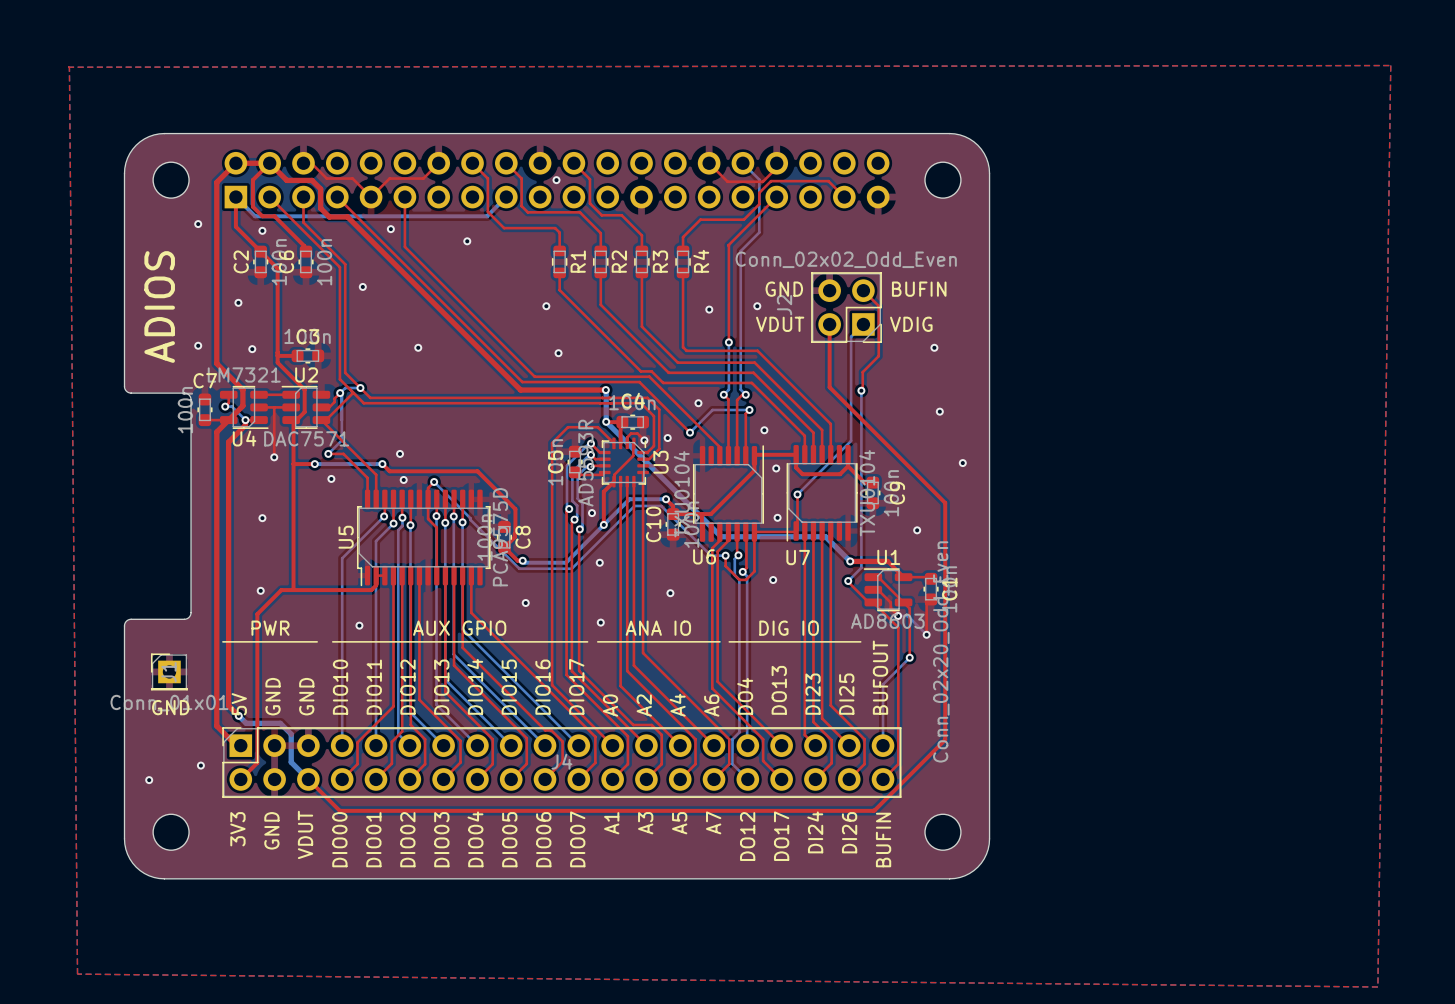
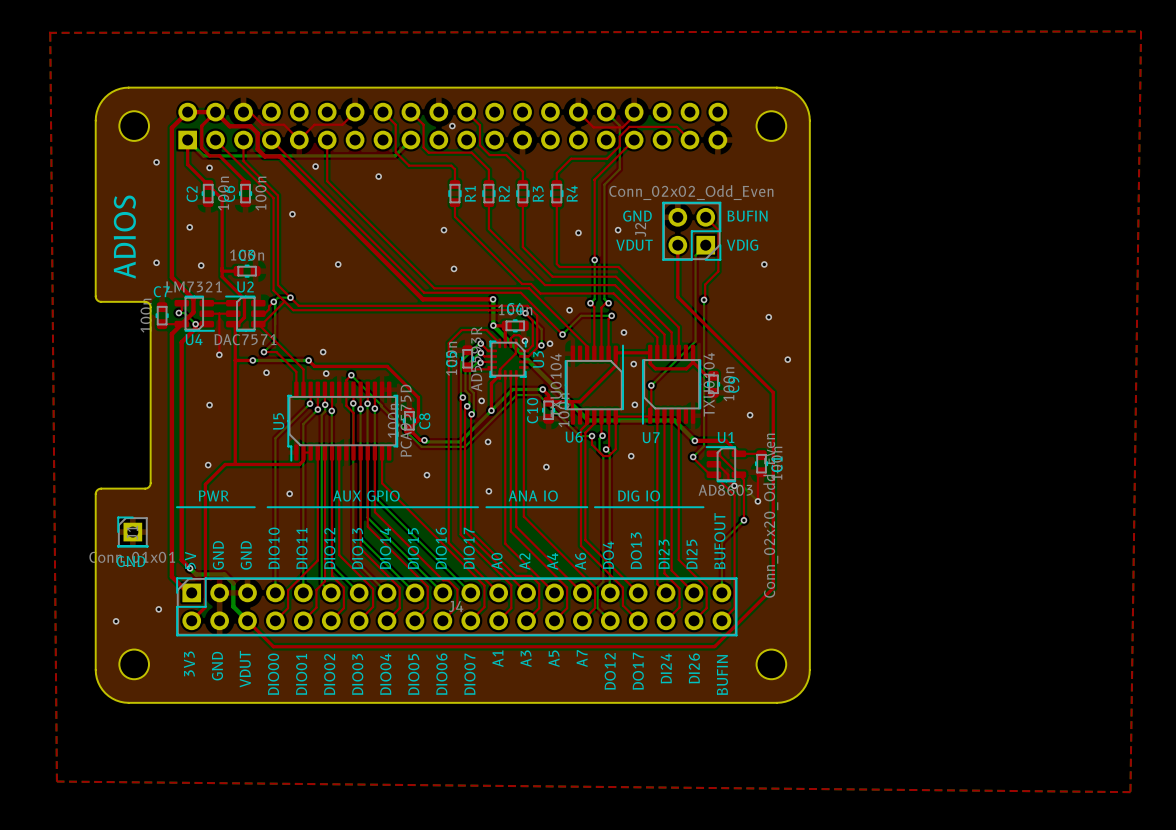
bottom track: none -> (525, 313) (541, 329) (541, 345)
via: none -> (525, 313)
via: (667, 438) -> none
via: none -> (550, 343)
via: none -> (541, 345)

